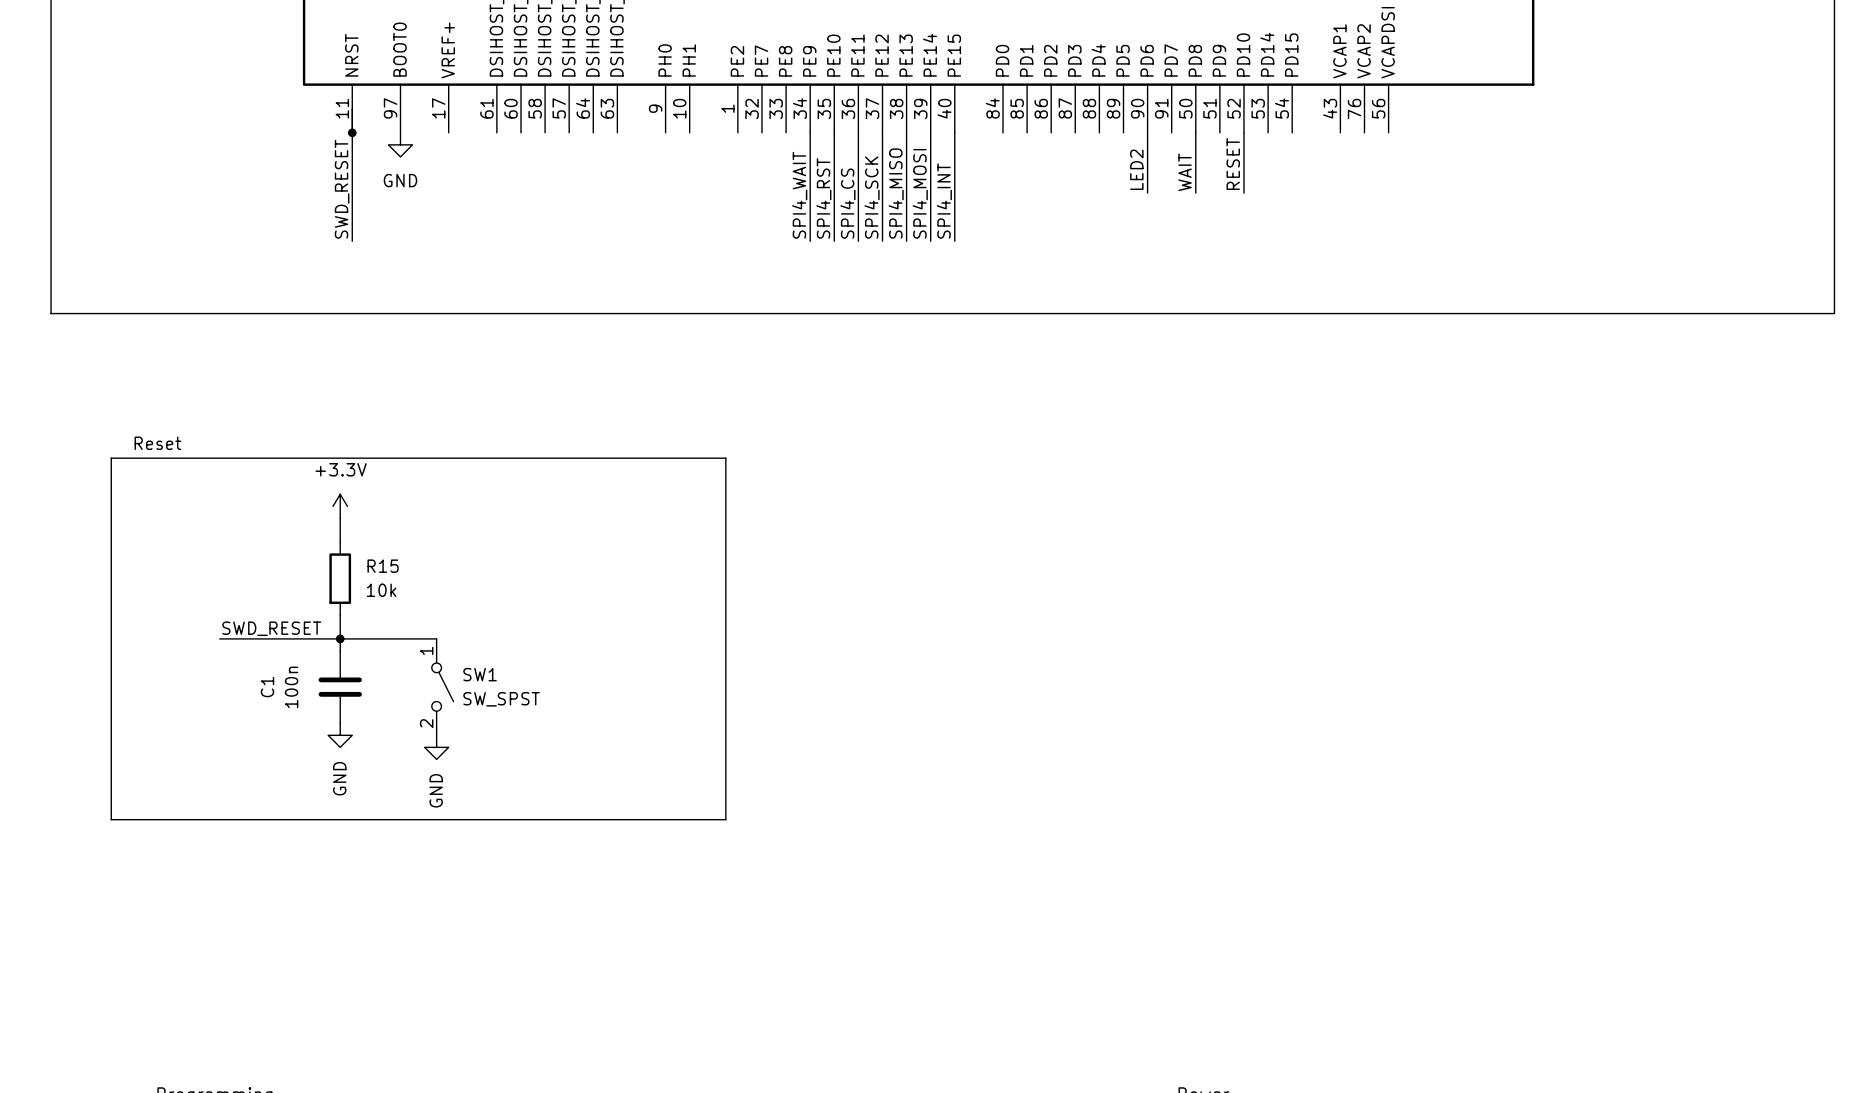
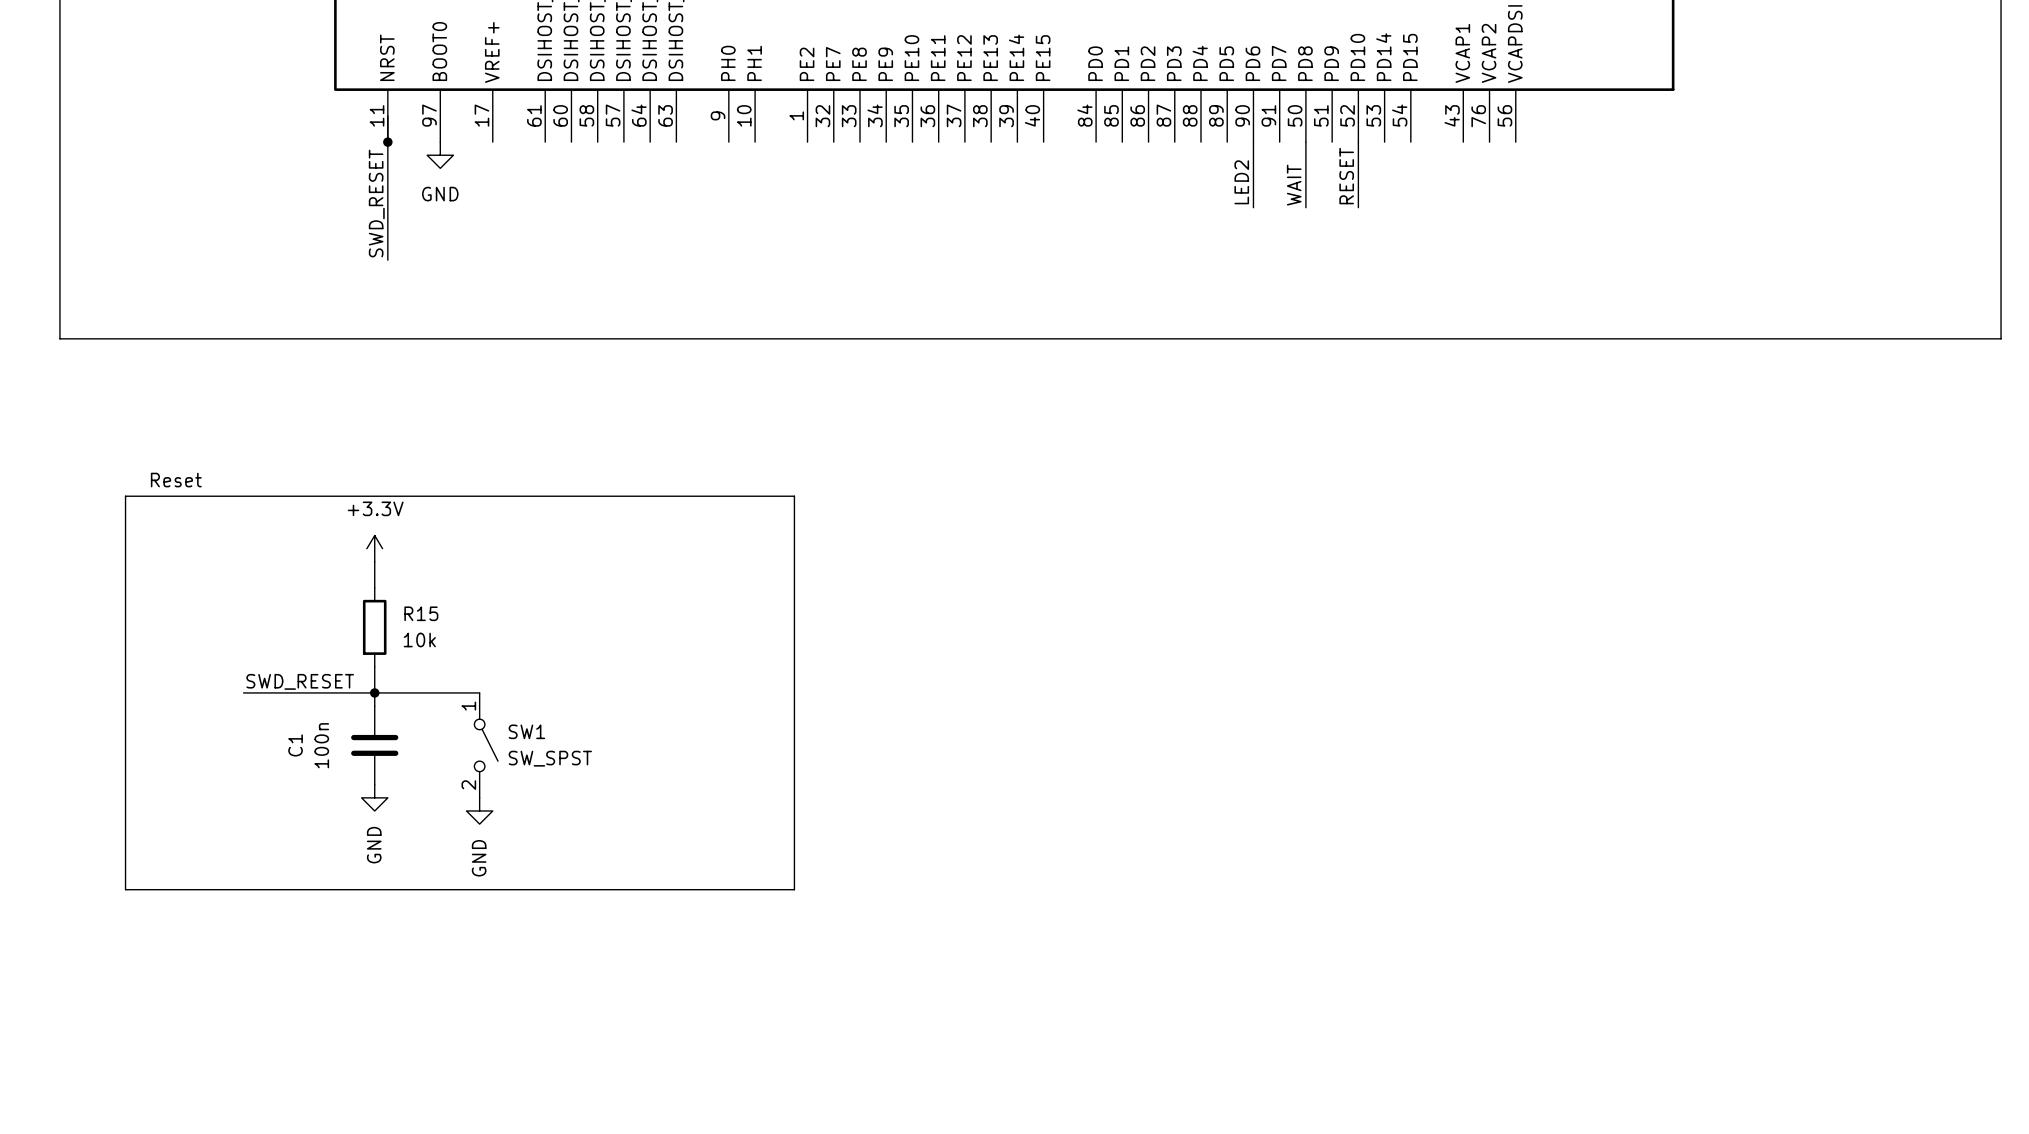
wire: (810, 132) (810, 241) -> none
wire: (834, 132) (834, 241) -> none
wire: (858, 132) (858, 241) -> none
wire: (882, 132) (882, 241) -> none
wire: (906, 132) (906, 241) -> none
wire: (930, 132) (930, 241) -> none
wire: (954, 132) (954, 241) -> none
label: SPI4_MISO (896, 193) -> none
label: SPI4_MOSI (920, 193) -> none
label: SPI4_WAIT (799, 195) -> none
label: SPI4_SCK (872, 197) -> none
label: SPI4_RST (823, 198) -> none
label: SPI4_INT (944, 201) -> none
label: SPI4_CS (847, 203) -> none

